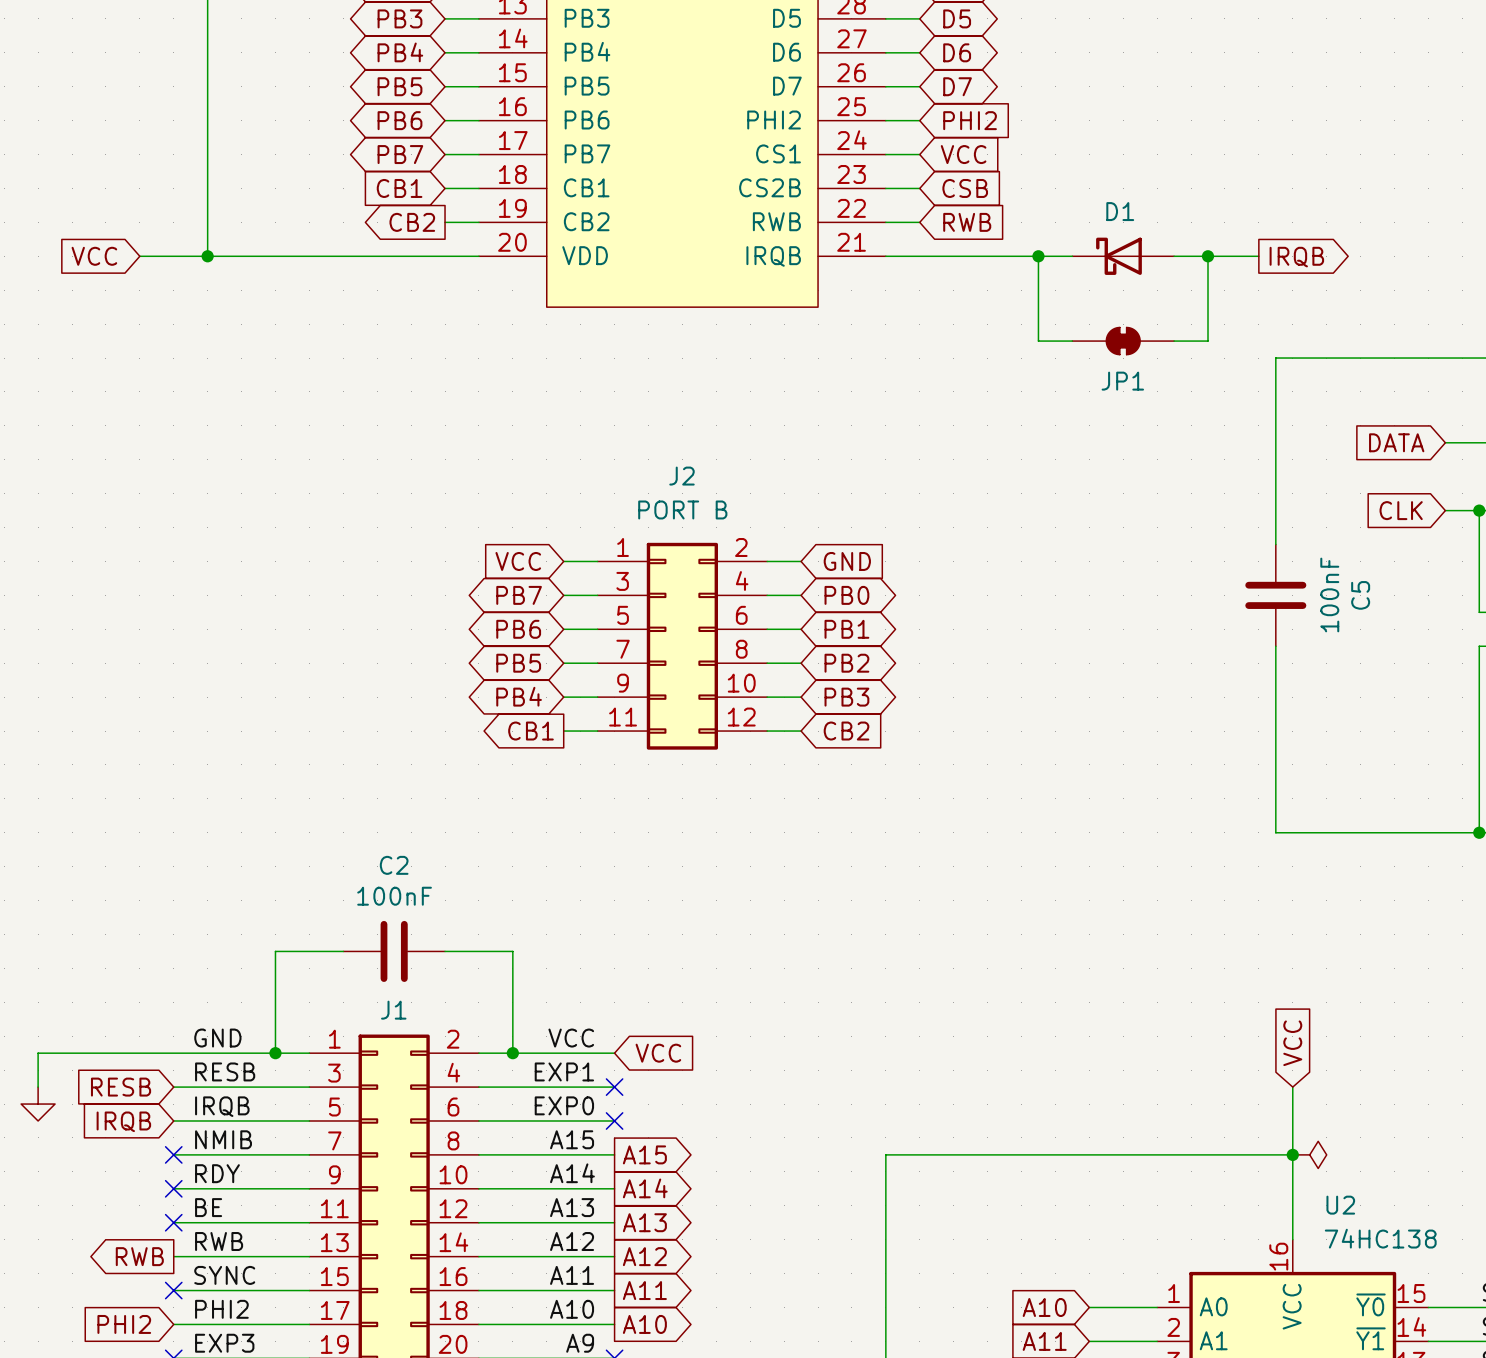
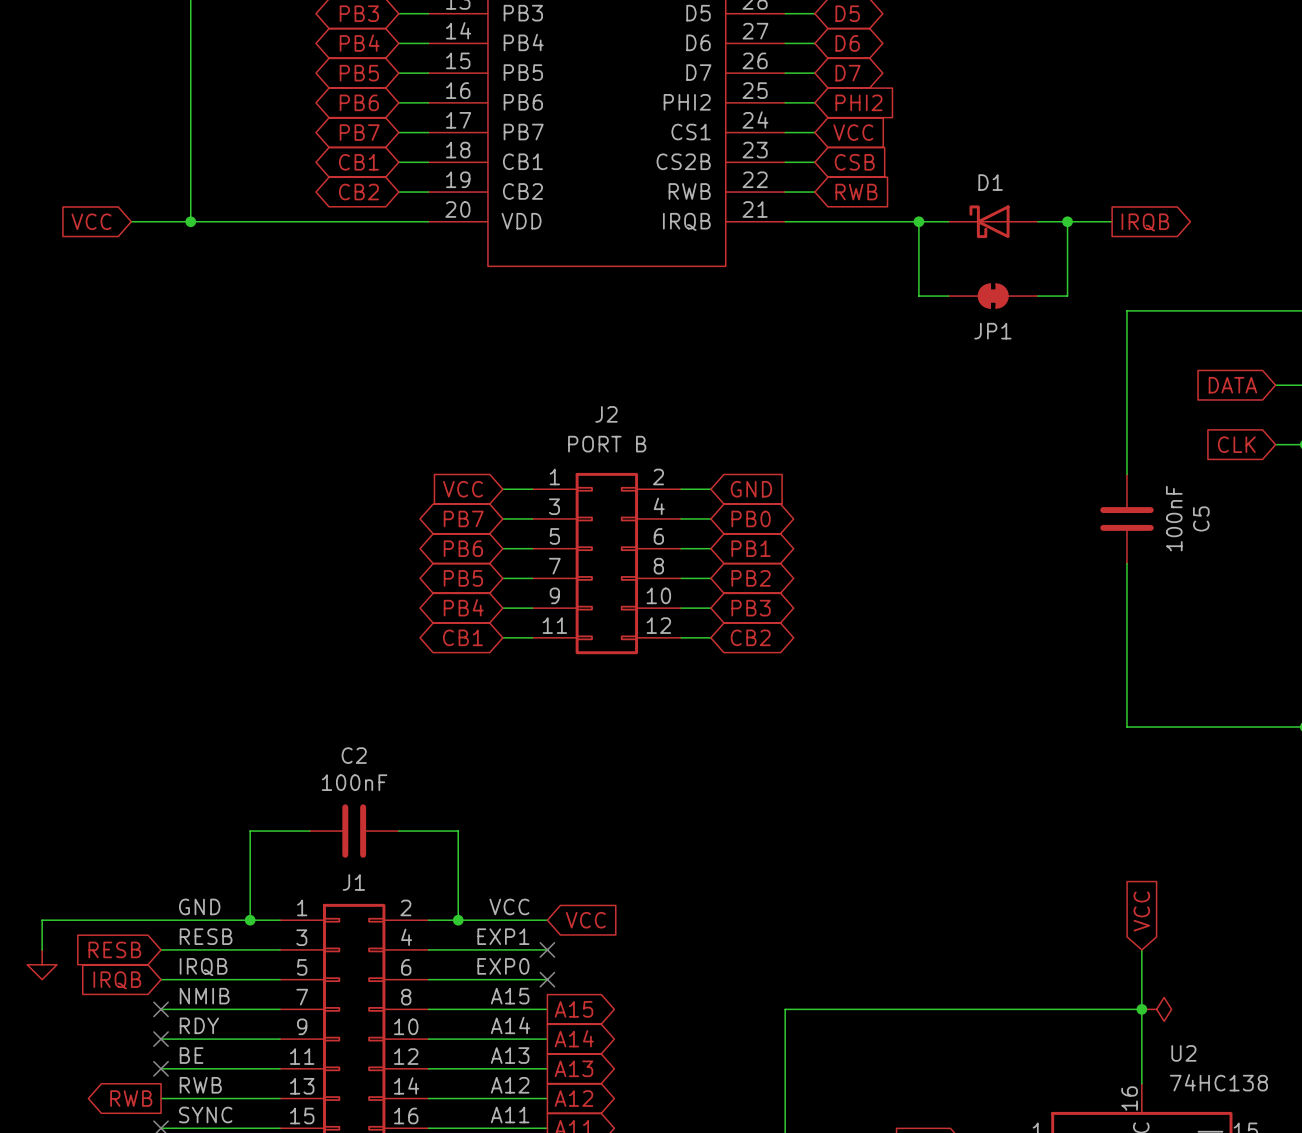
global label shape: input (399, 188) -> bidirectional (358, 162)
global label shape: output (412, 222) -> bidirectional (358, 192)
global label shape: output (530, 731) -> bidirectional (462, 637)
global label shape: input (846, 731) -> bidirectional (750, 637)

